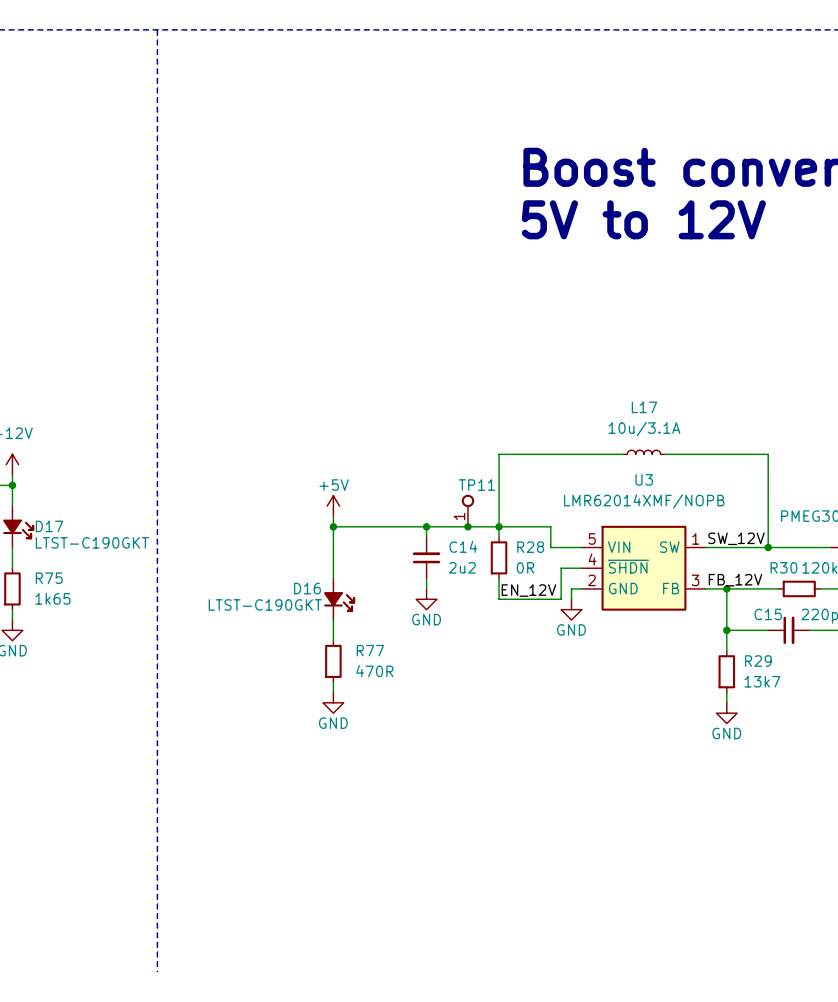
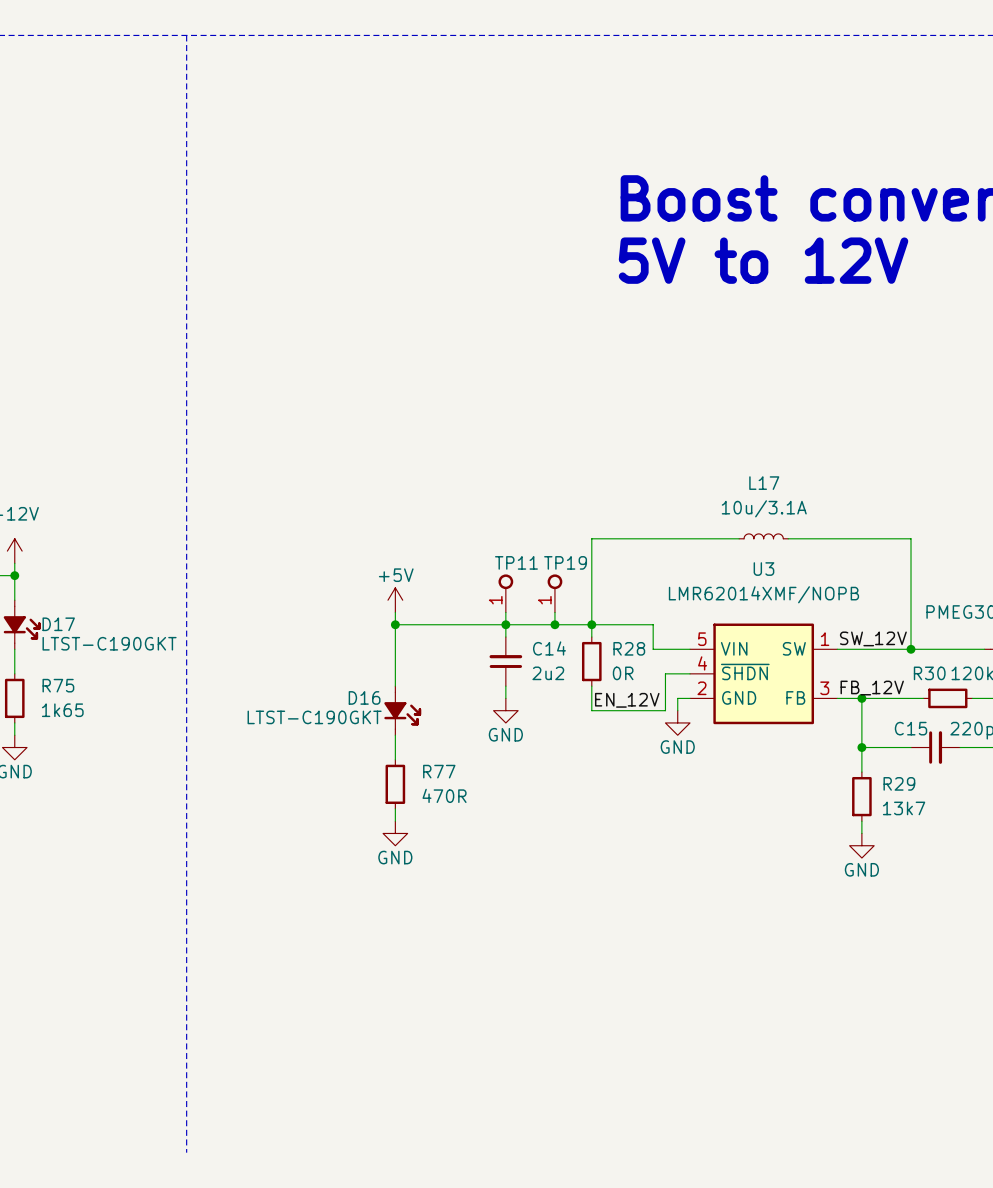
TP19: none -> (554, 593)
TP11 position: (467, 510) -> (505, 593)
wire: none -> (505, 612) (505, 624)

